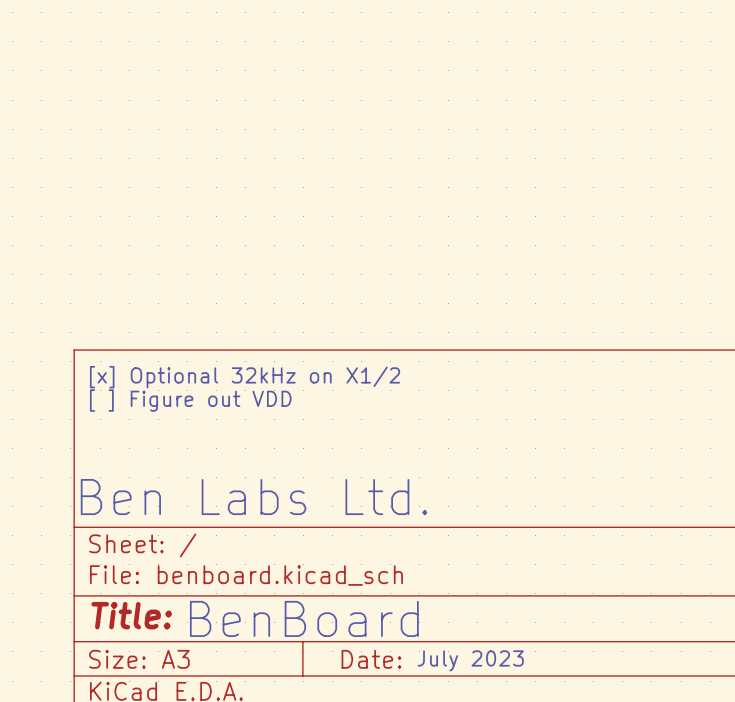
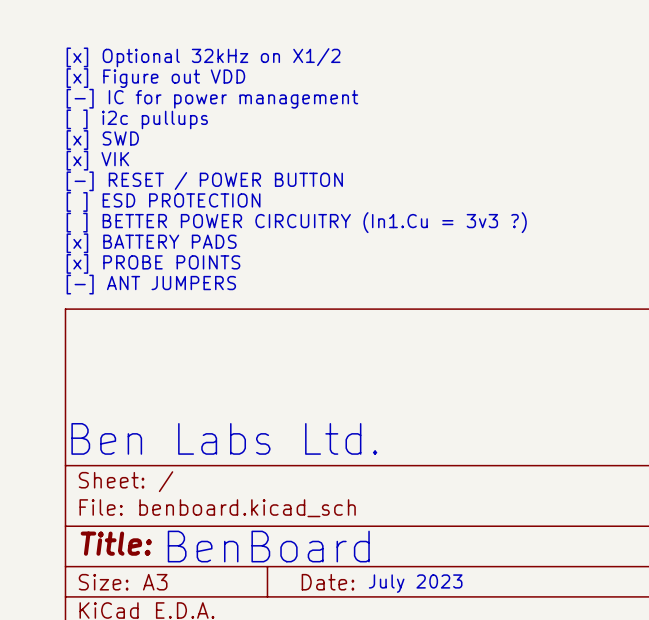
text: none -> [x] Optional 32kHz on X1/2 (203, 57)
text: none -> [x] Figure out VDD (155, 78)
text: none -> [-] IC for power management (212, 98)
text: none -> [ ] i2c pullups (137, 119)
text: none -> [x] SWD (102, 140)
text: none -> [x] VIK (97, 160)
text: none -> [-] RESET / POWER BUTTON (204, 181)
text: none -> [ ] ESD PROTECTION (163, 201)
text: none -> [ ] BETTER POWER CIRCUITRY (In1.Cu = 3v3 ?) (296, 222)
text: none -> [x] BATTERY PADS (151, 243)
text: none -> [x] PROBE POINTS (153, 263)
text: none -> [-] ANT JUMPERS (151, 284)
text: [x] Optional 32kHz on X1/2 (245, 377) -> none
text: [ ] Figure out VDD (190, 400) -> none

